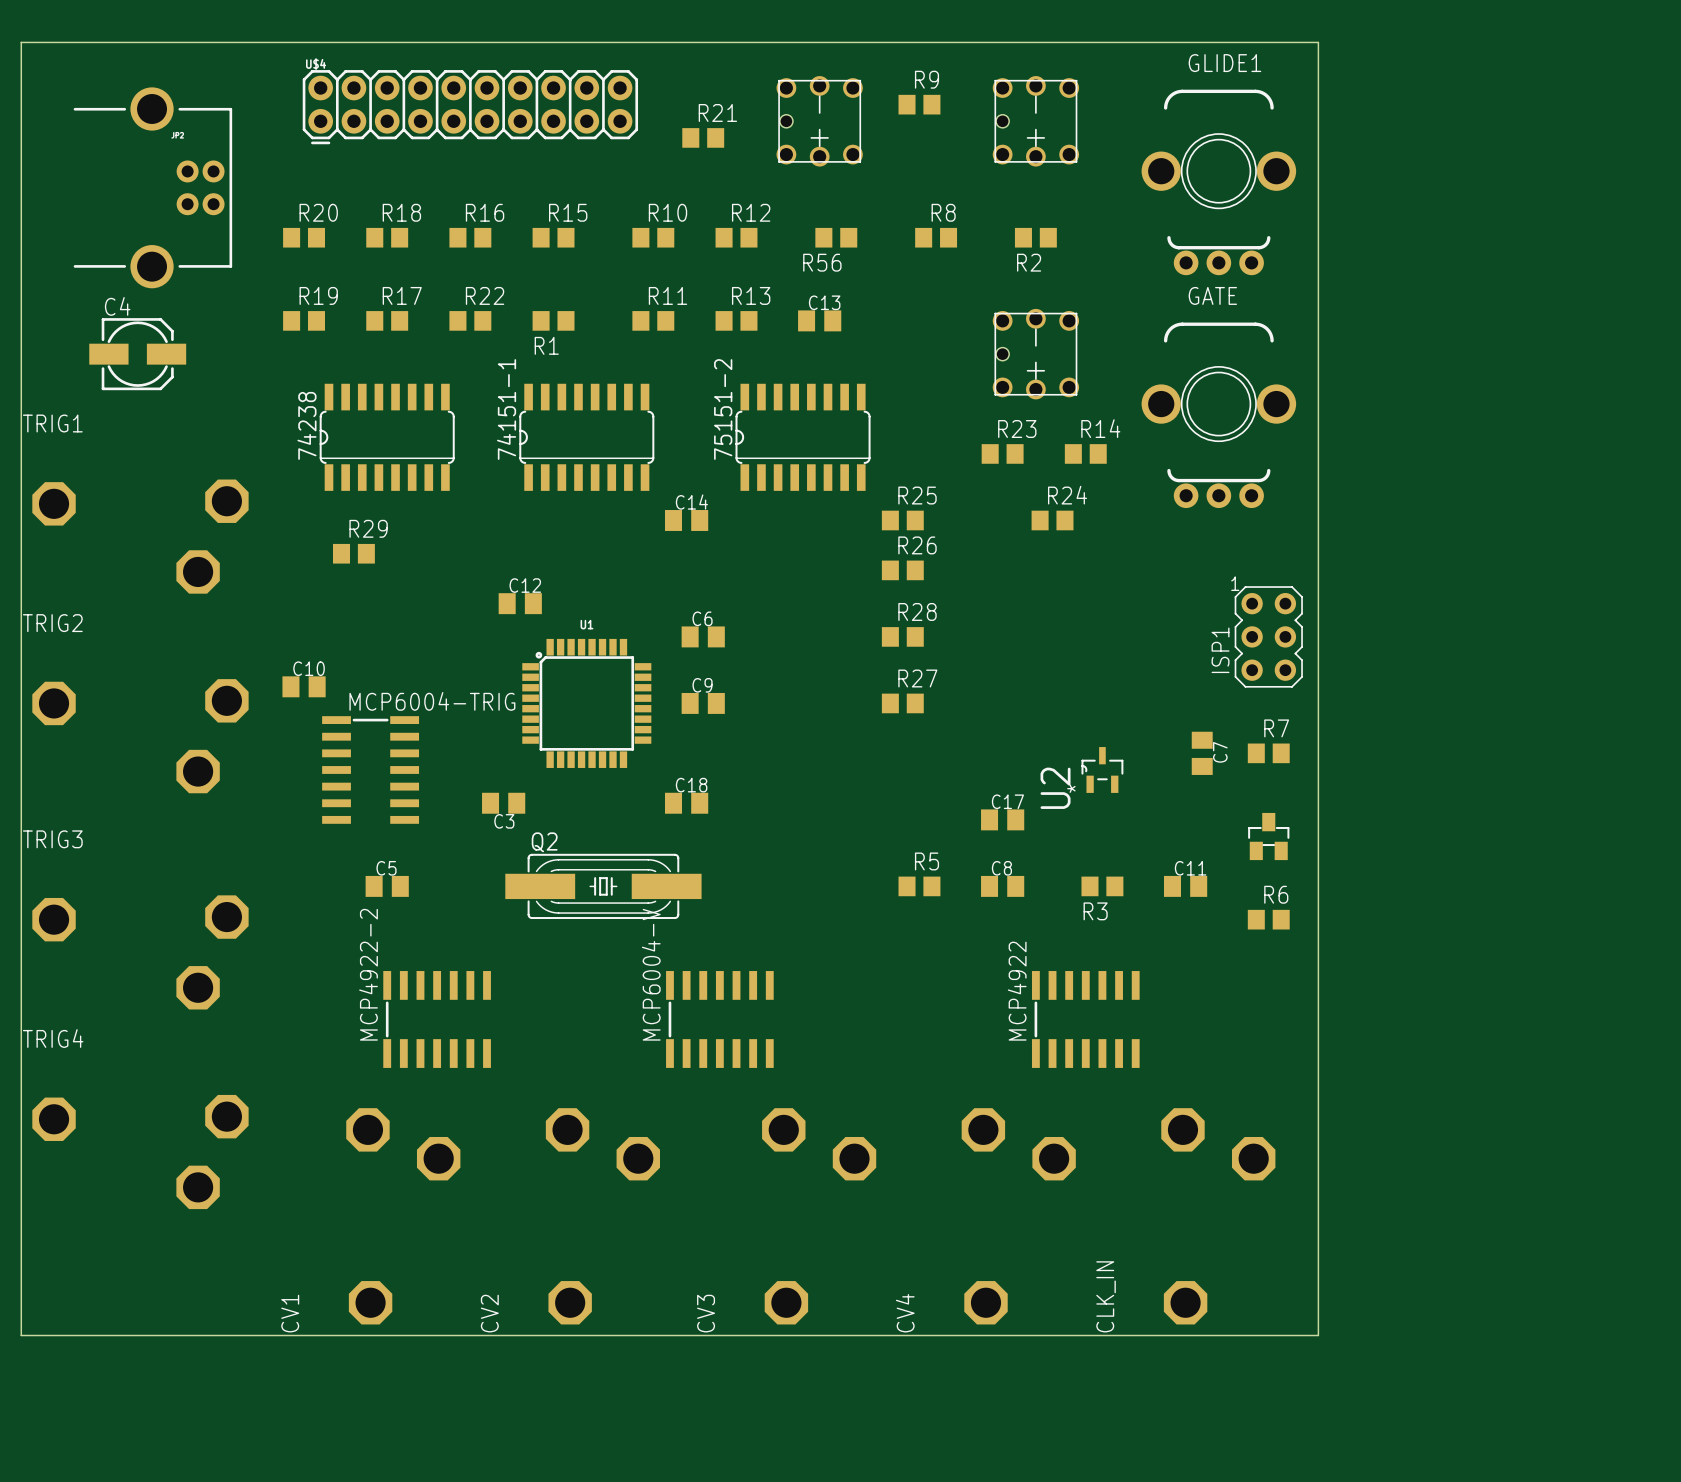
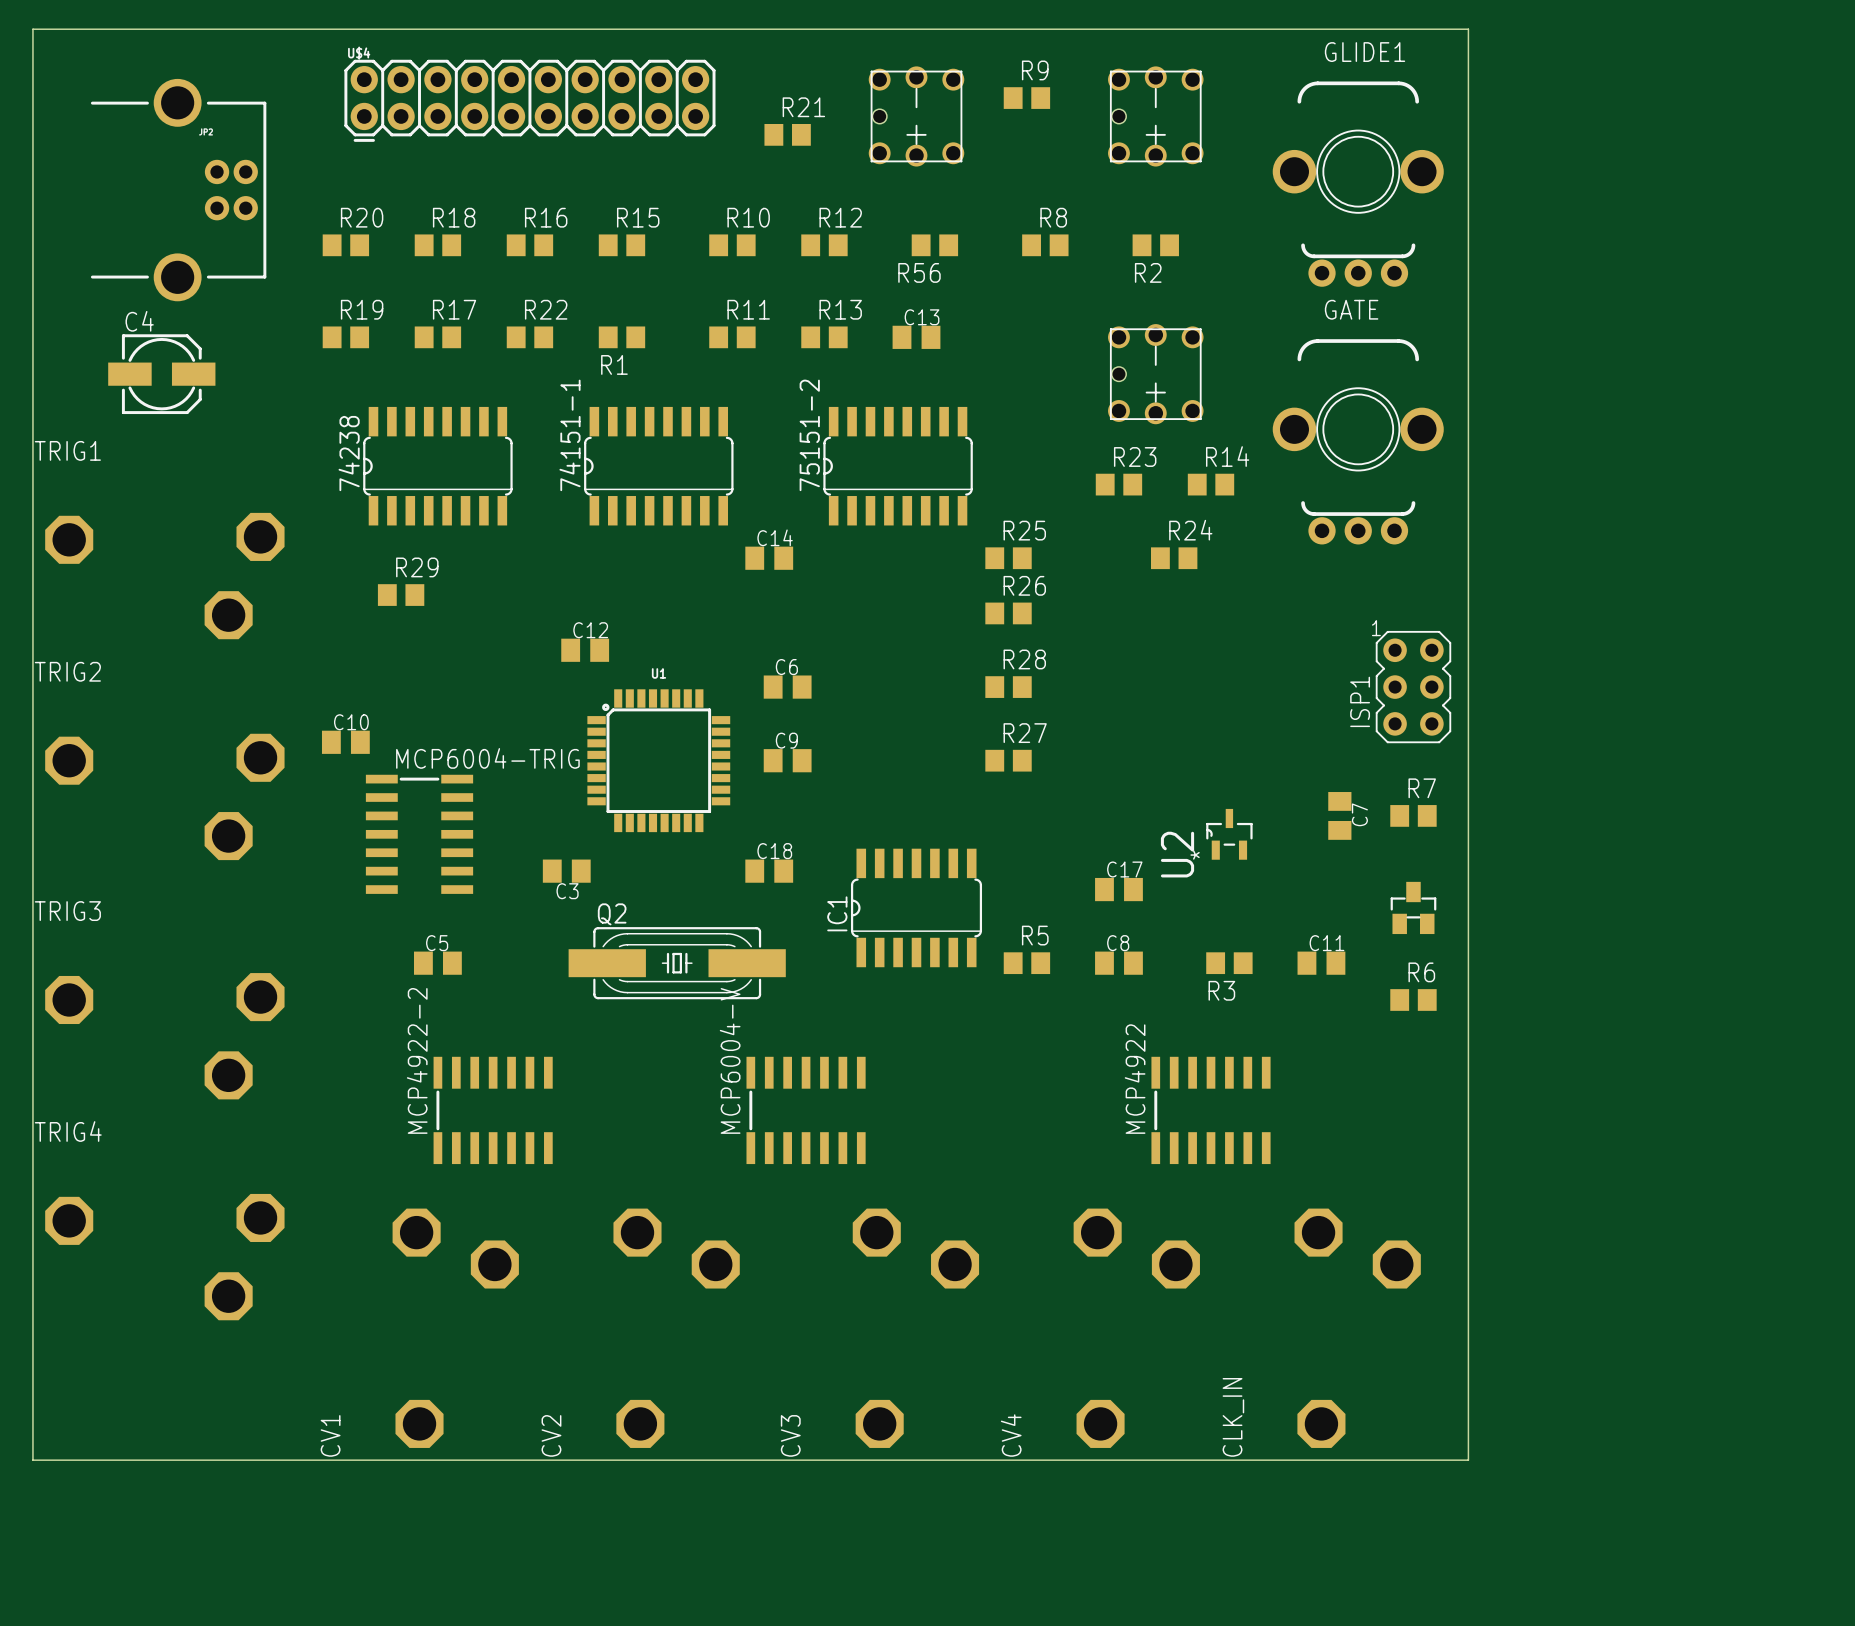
IC1: none -> (916, 907)

